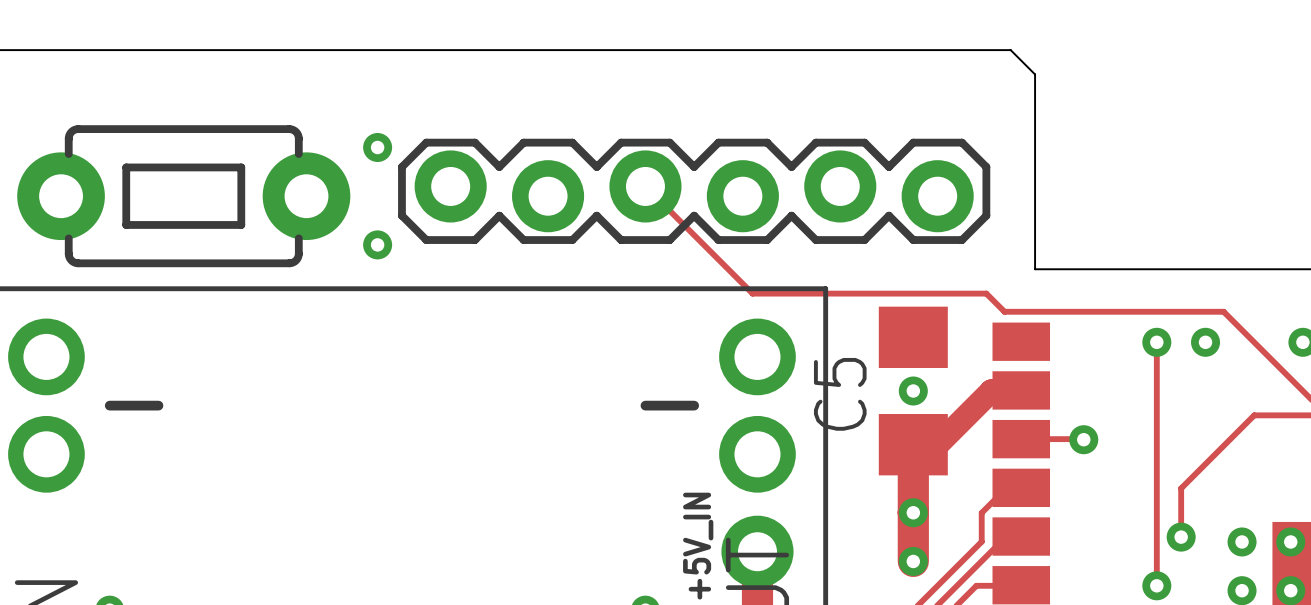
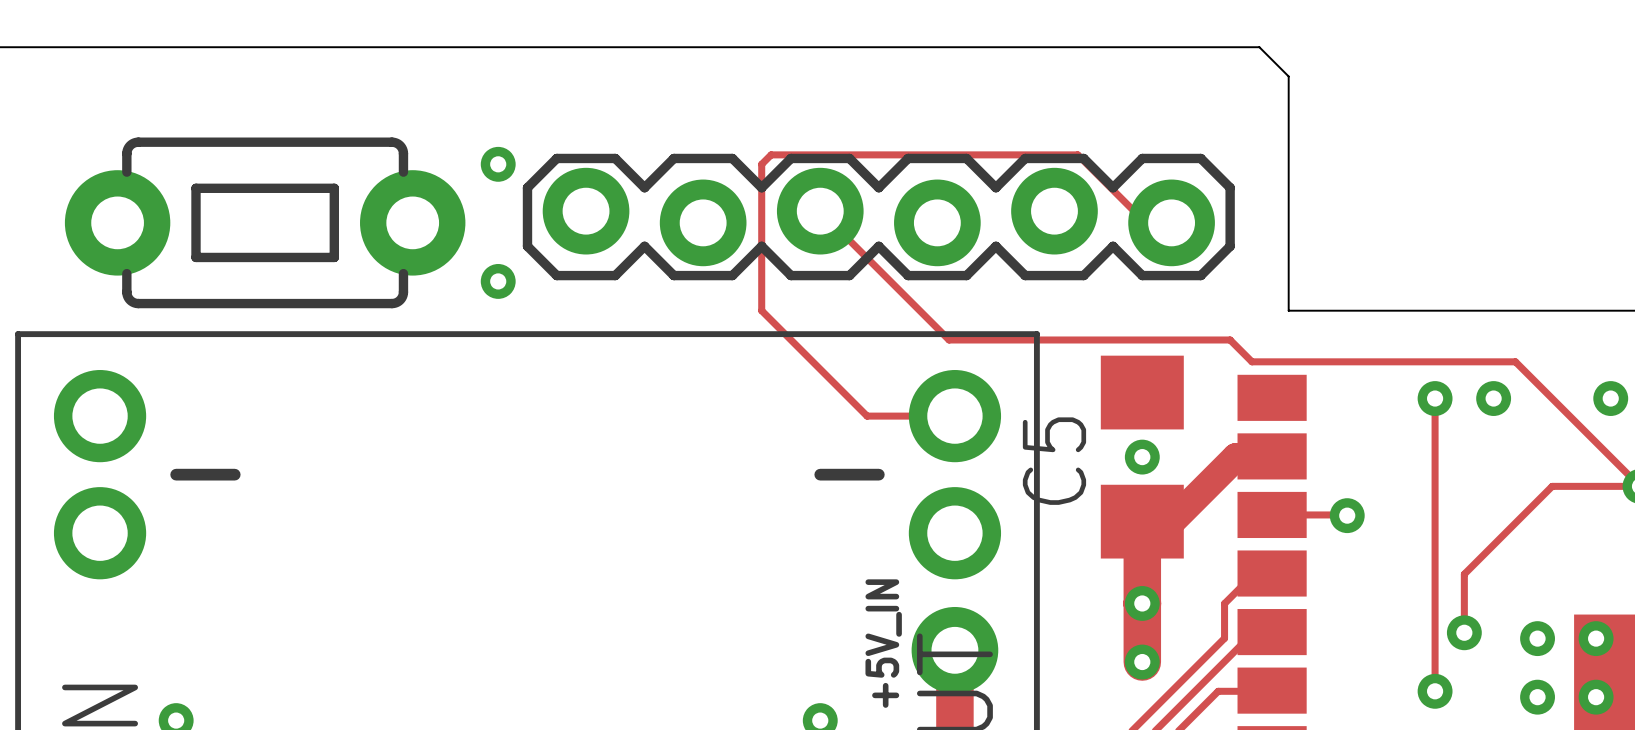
track: none -> (1171, 222) (1145, 222) (1077, 154) (771, 154) (761, 164) (761, 310) (867, 416) (954, 416)

